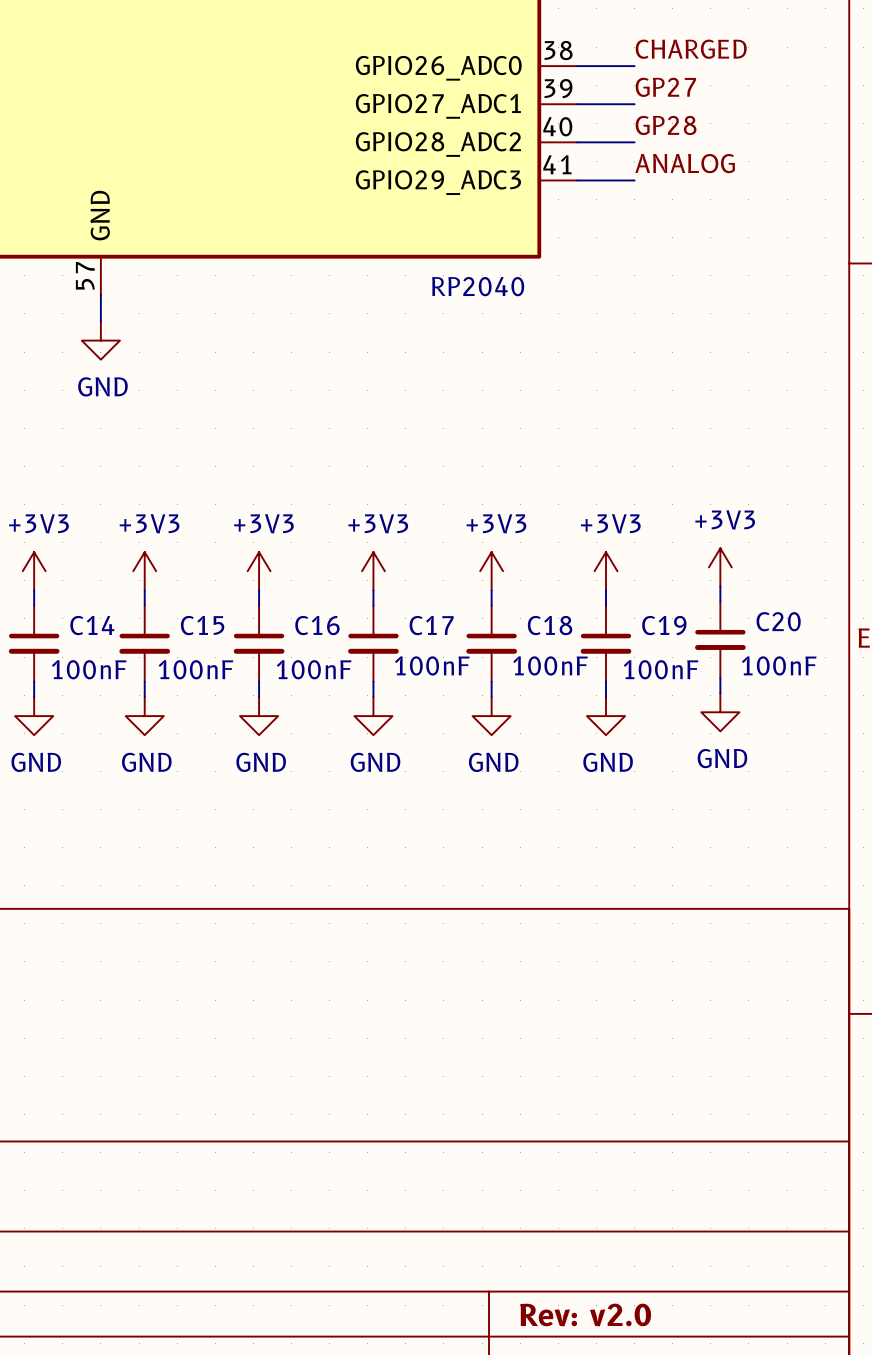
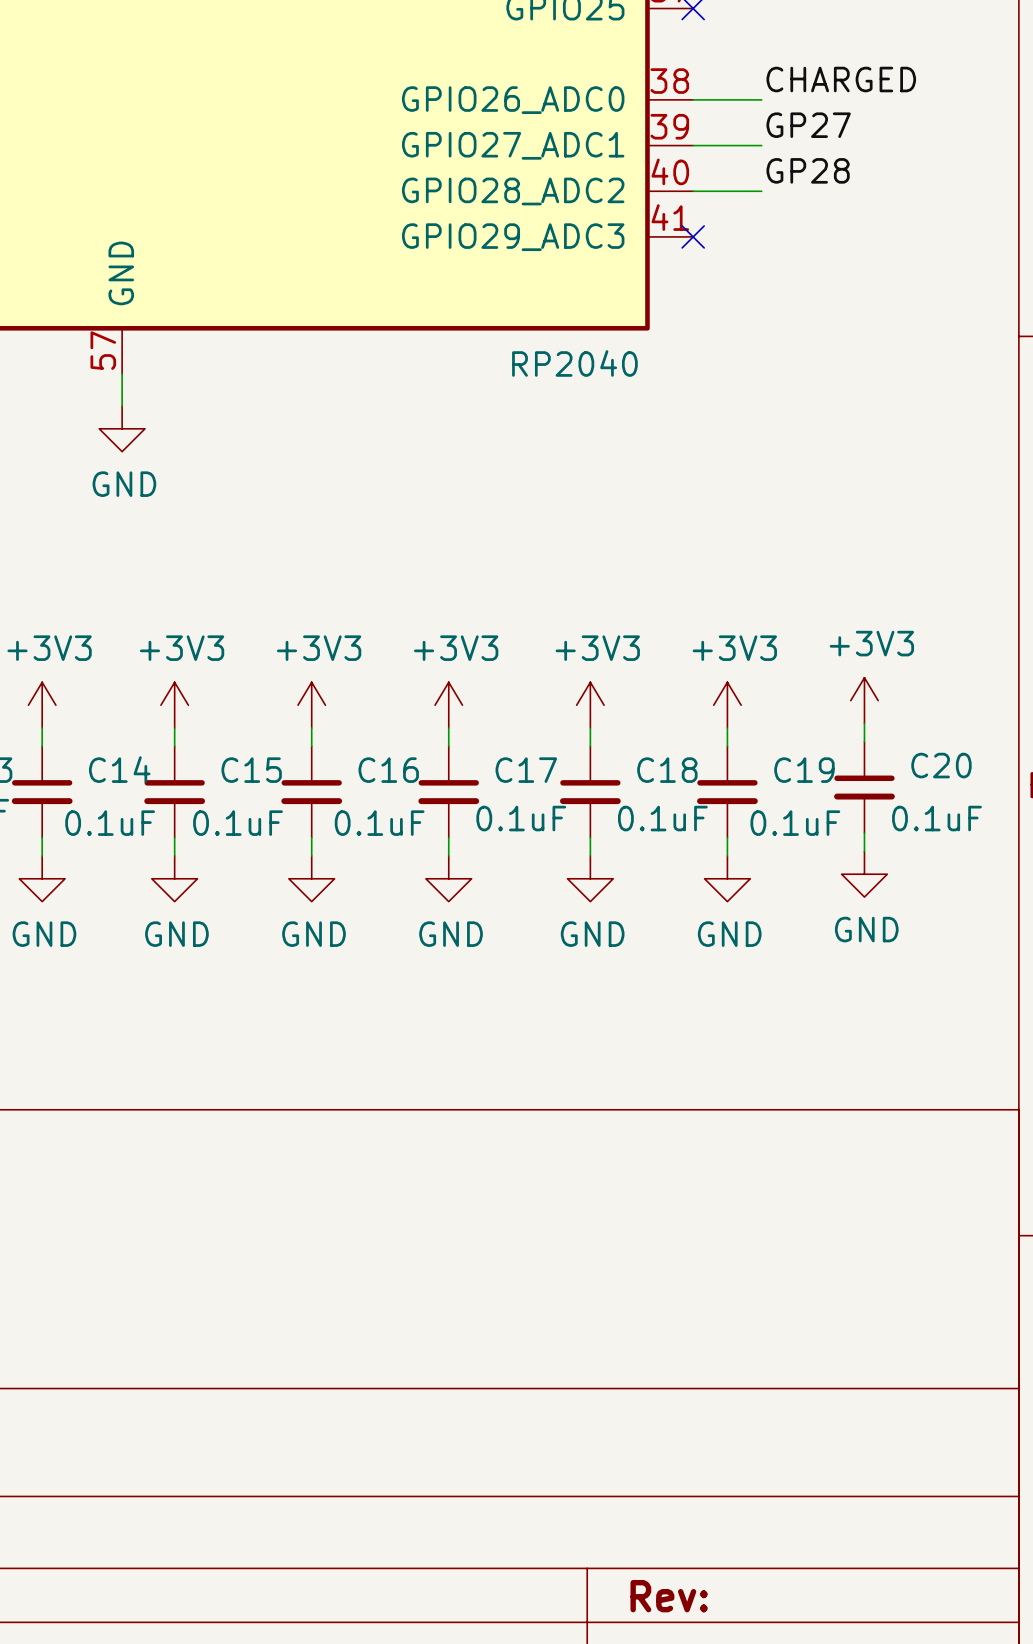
label: ANALOG (685, 163) -> none
wire: (577, 180) (634, 180) -> none
no-connect mark: none -> (693, 236)
C17 value: 100nF (432, 665) -> 0.1uF (521, 818)
C18 value: 100nF (550, 665) -> 0.1uF (662, 818)
C20 value: 100nF (779, 665) -> 0.1uF (936, 818)
C14 value: 100nF (89, 669) -> 0.1uF (110, 823)
C15 value: 100nF (195, 669) -> 0.1uF (238, 823)
C16 value: 100nF (314, 669) -> 0.1uF (379, 823)
C19 value: 100nF (661, 669) -> 0.1uF (795, 823)
title block: Rev: v2.0 (585, 1315) -> Rev: (669, 1596)

